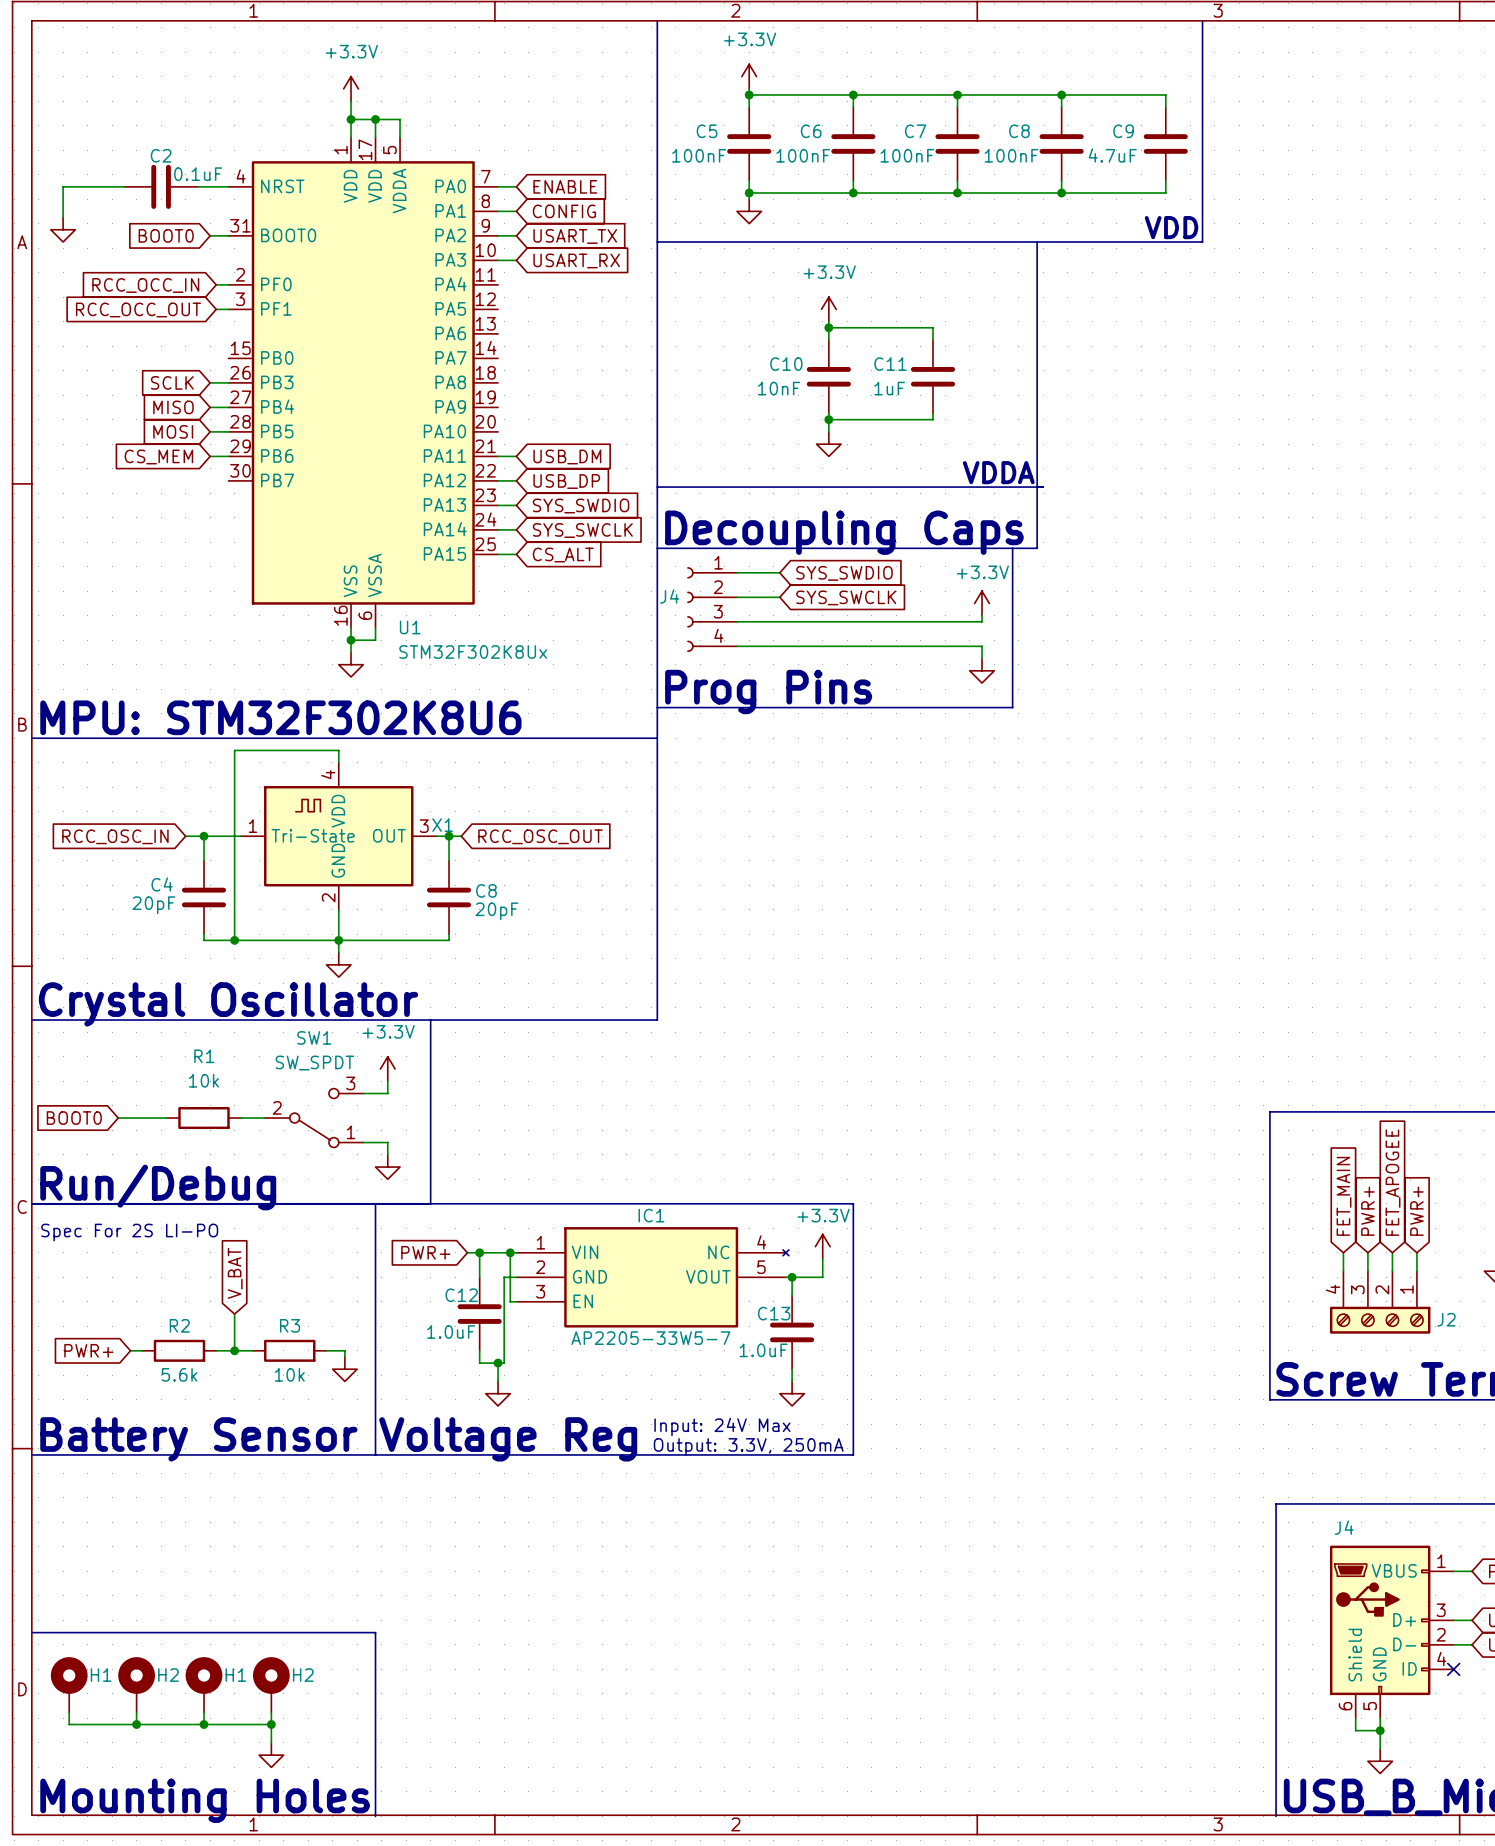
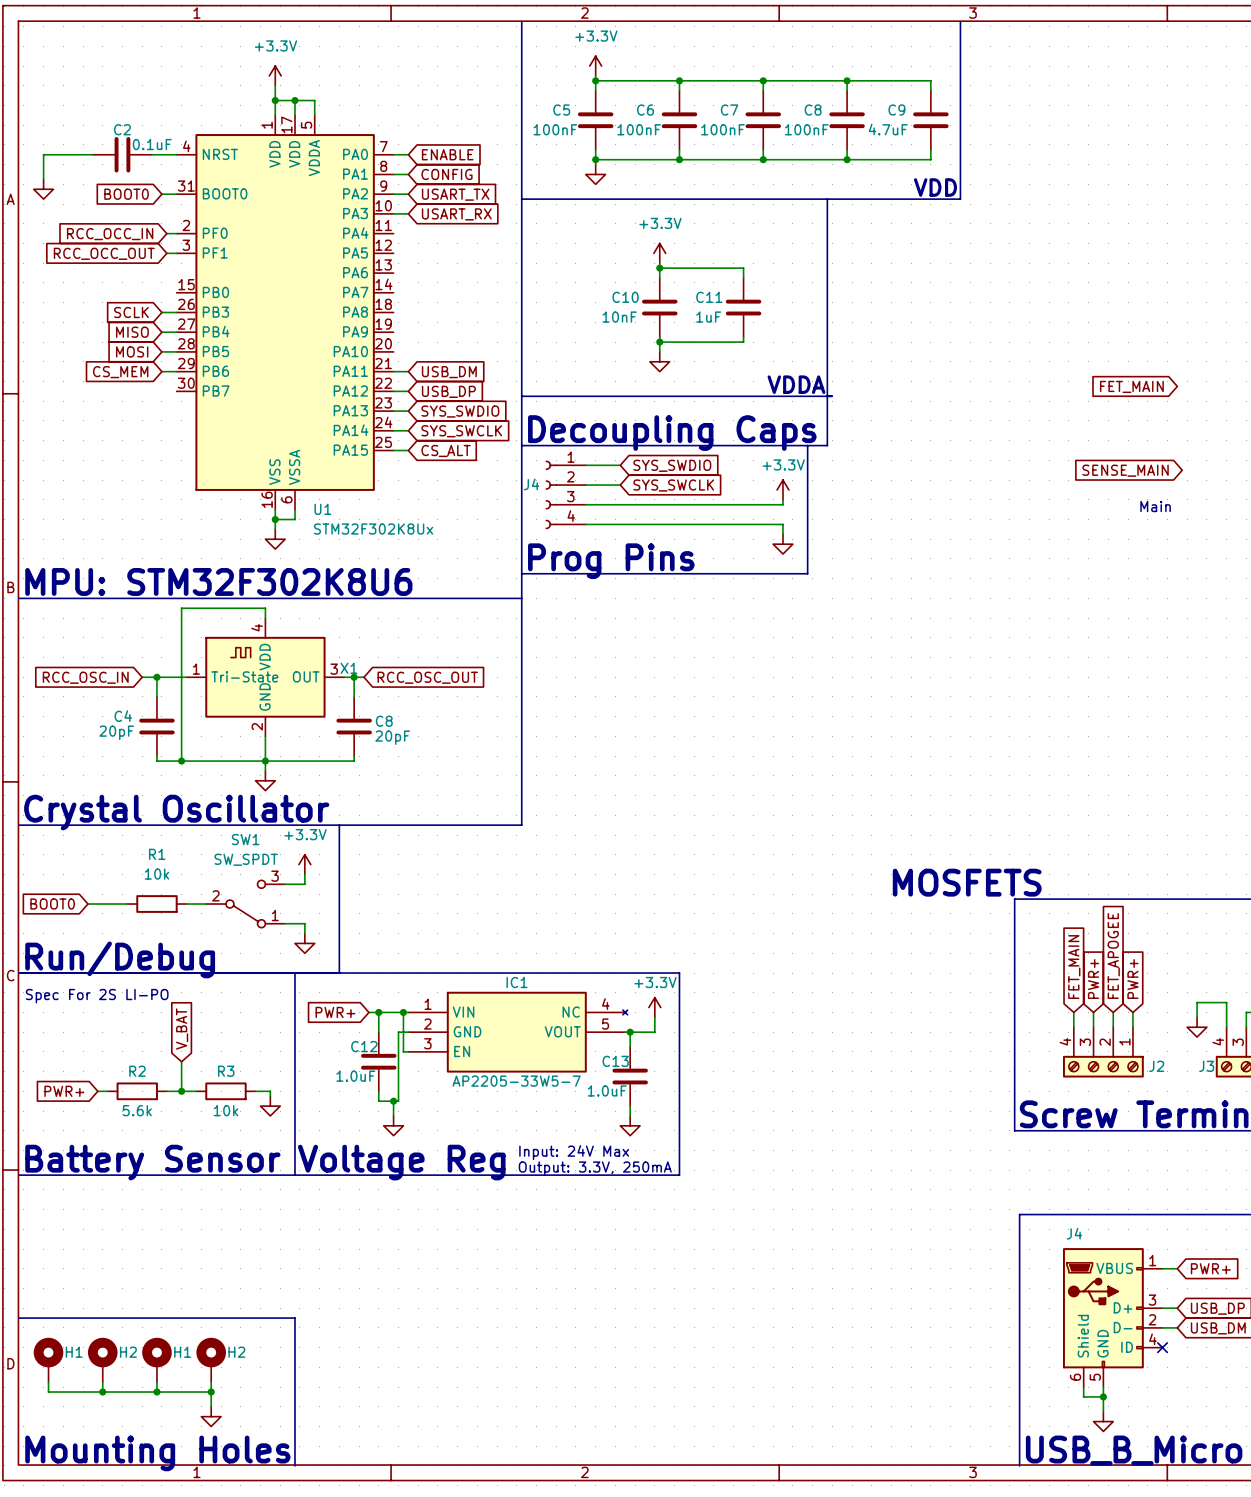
global label: none -> FET_MAIN (1131, 386)
global label: none -> SENSE_MAIN (1125, 470)
text: none -> Main (1155, 506)
text: none -> MOSFETS (967, 882)

